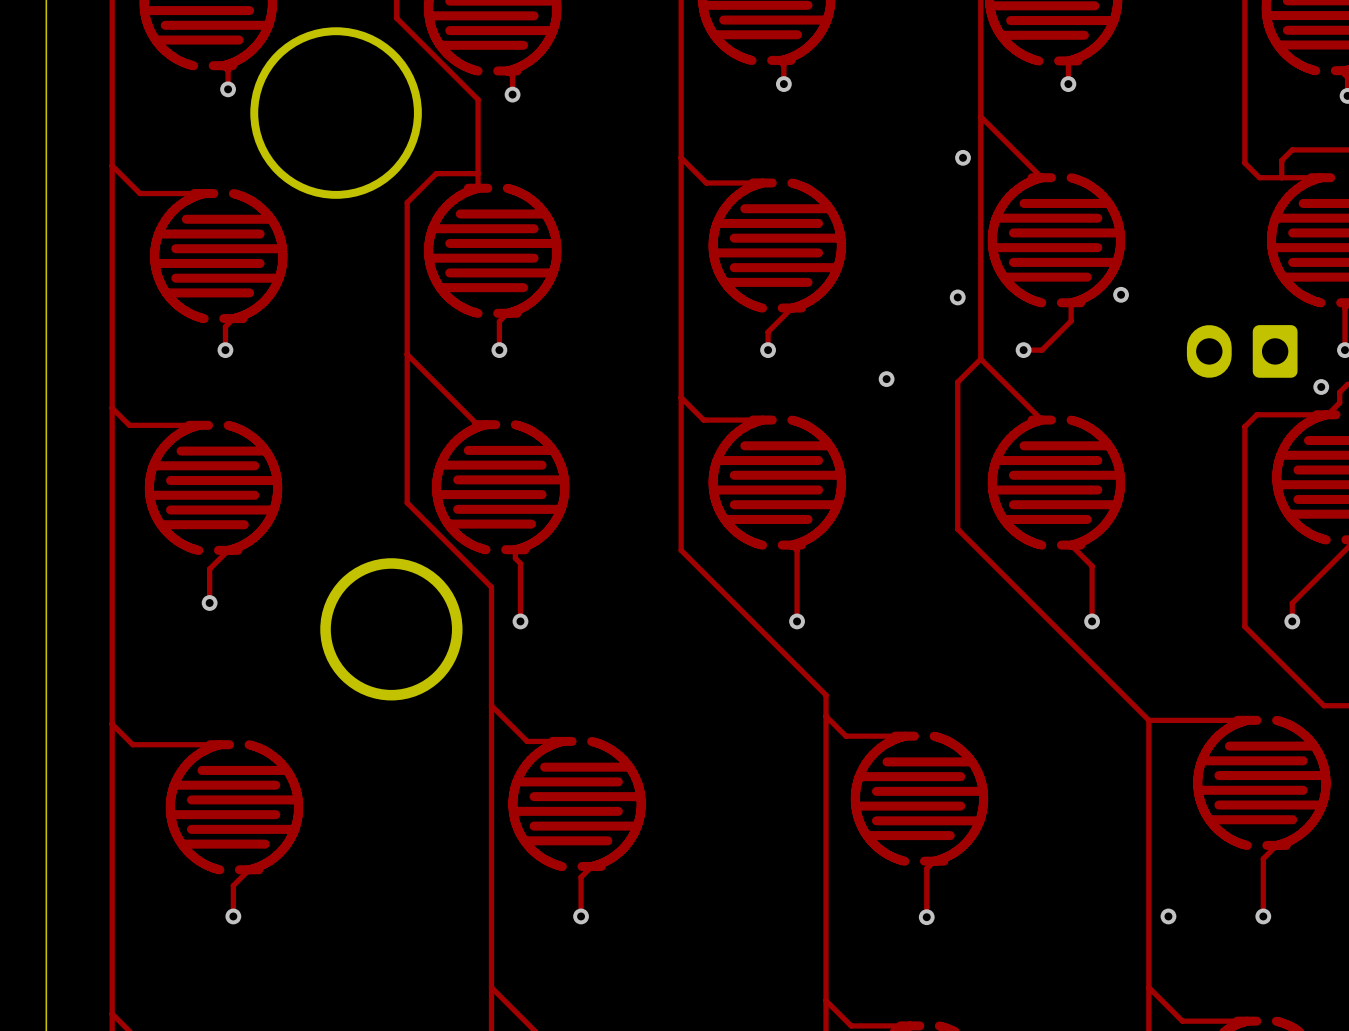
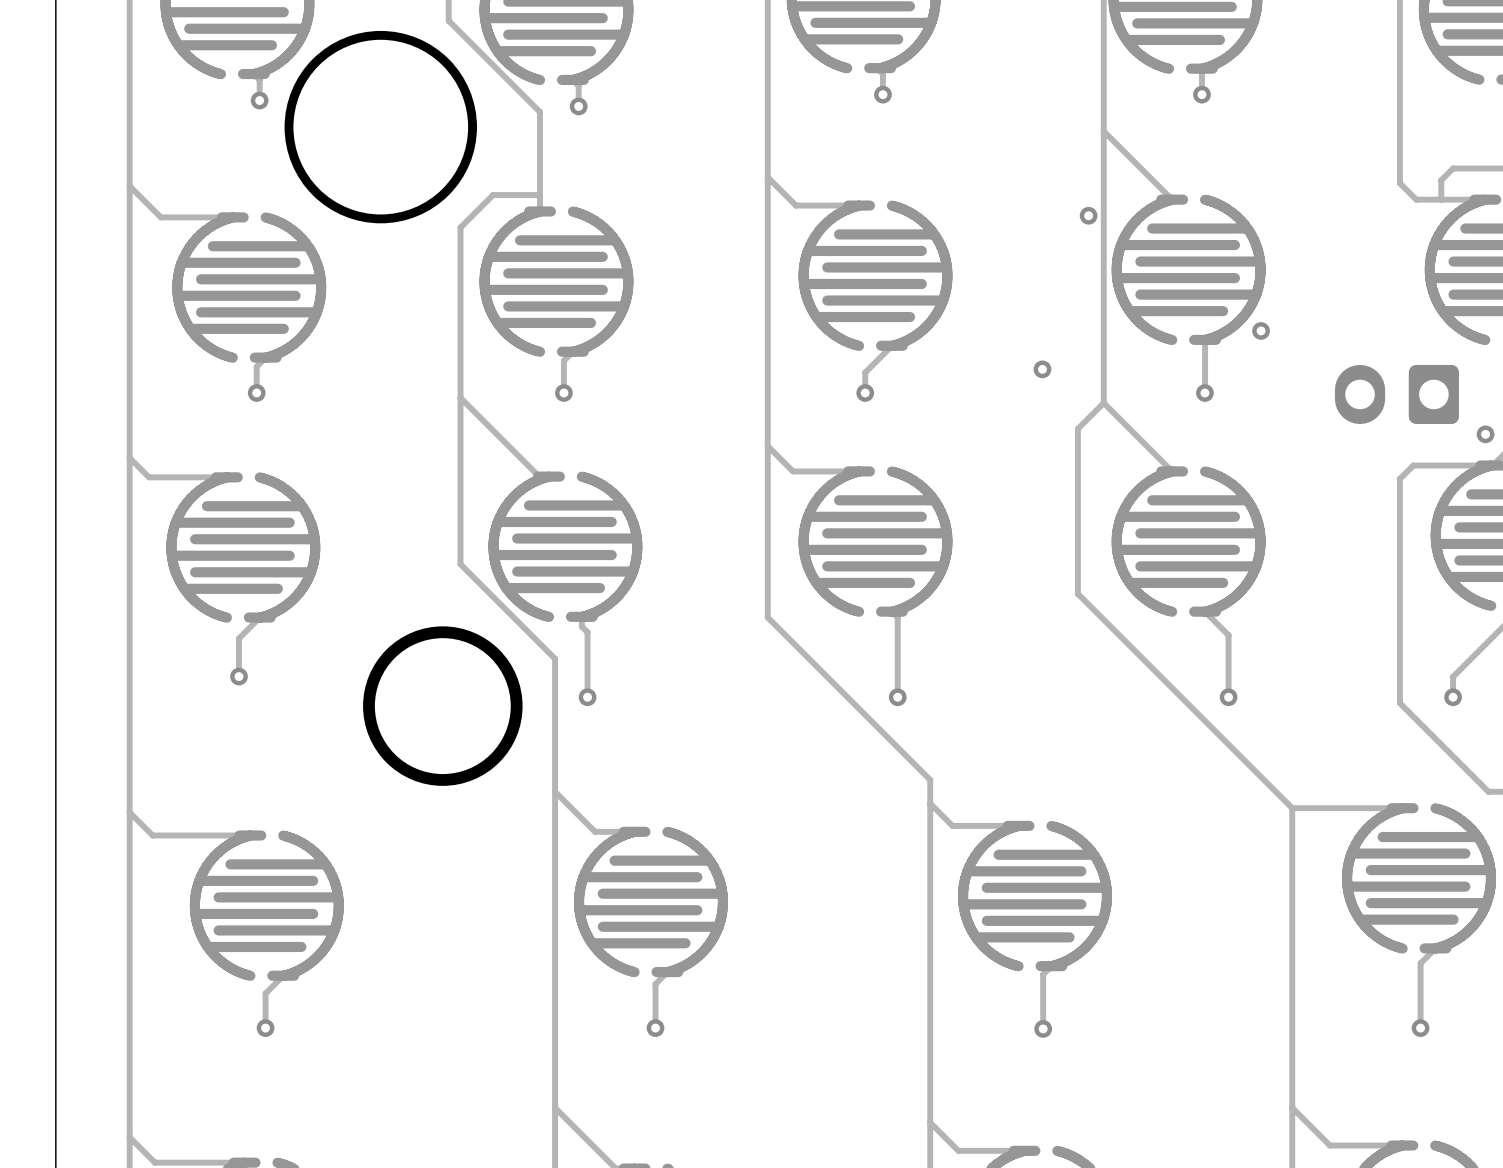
via position: (963, 157) -> (1088, 215)
via: (957, 297) -> none
track: (1071, 321) (1042, 350) (1023, 350) -> (1205, 360) (1205, 392)
via: none -> (1042, 369)
via position: (1023, 350) -> (1204, 392)
via: (886, 379) -> none
via: (1168, 916) -> none

